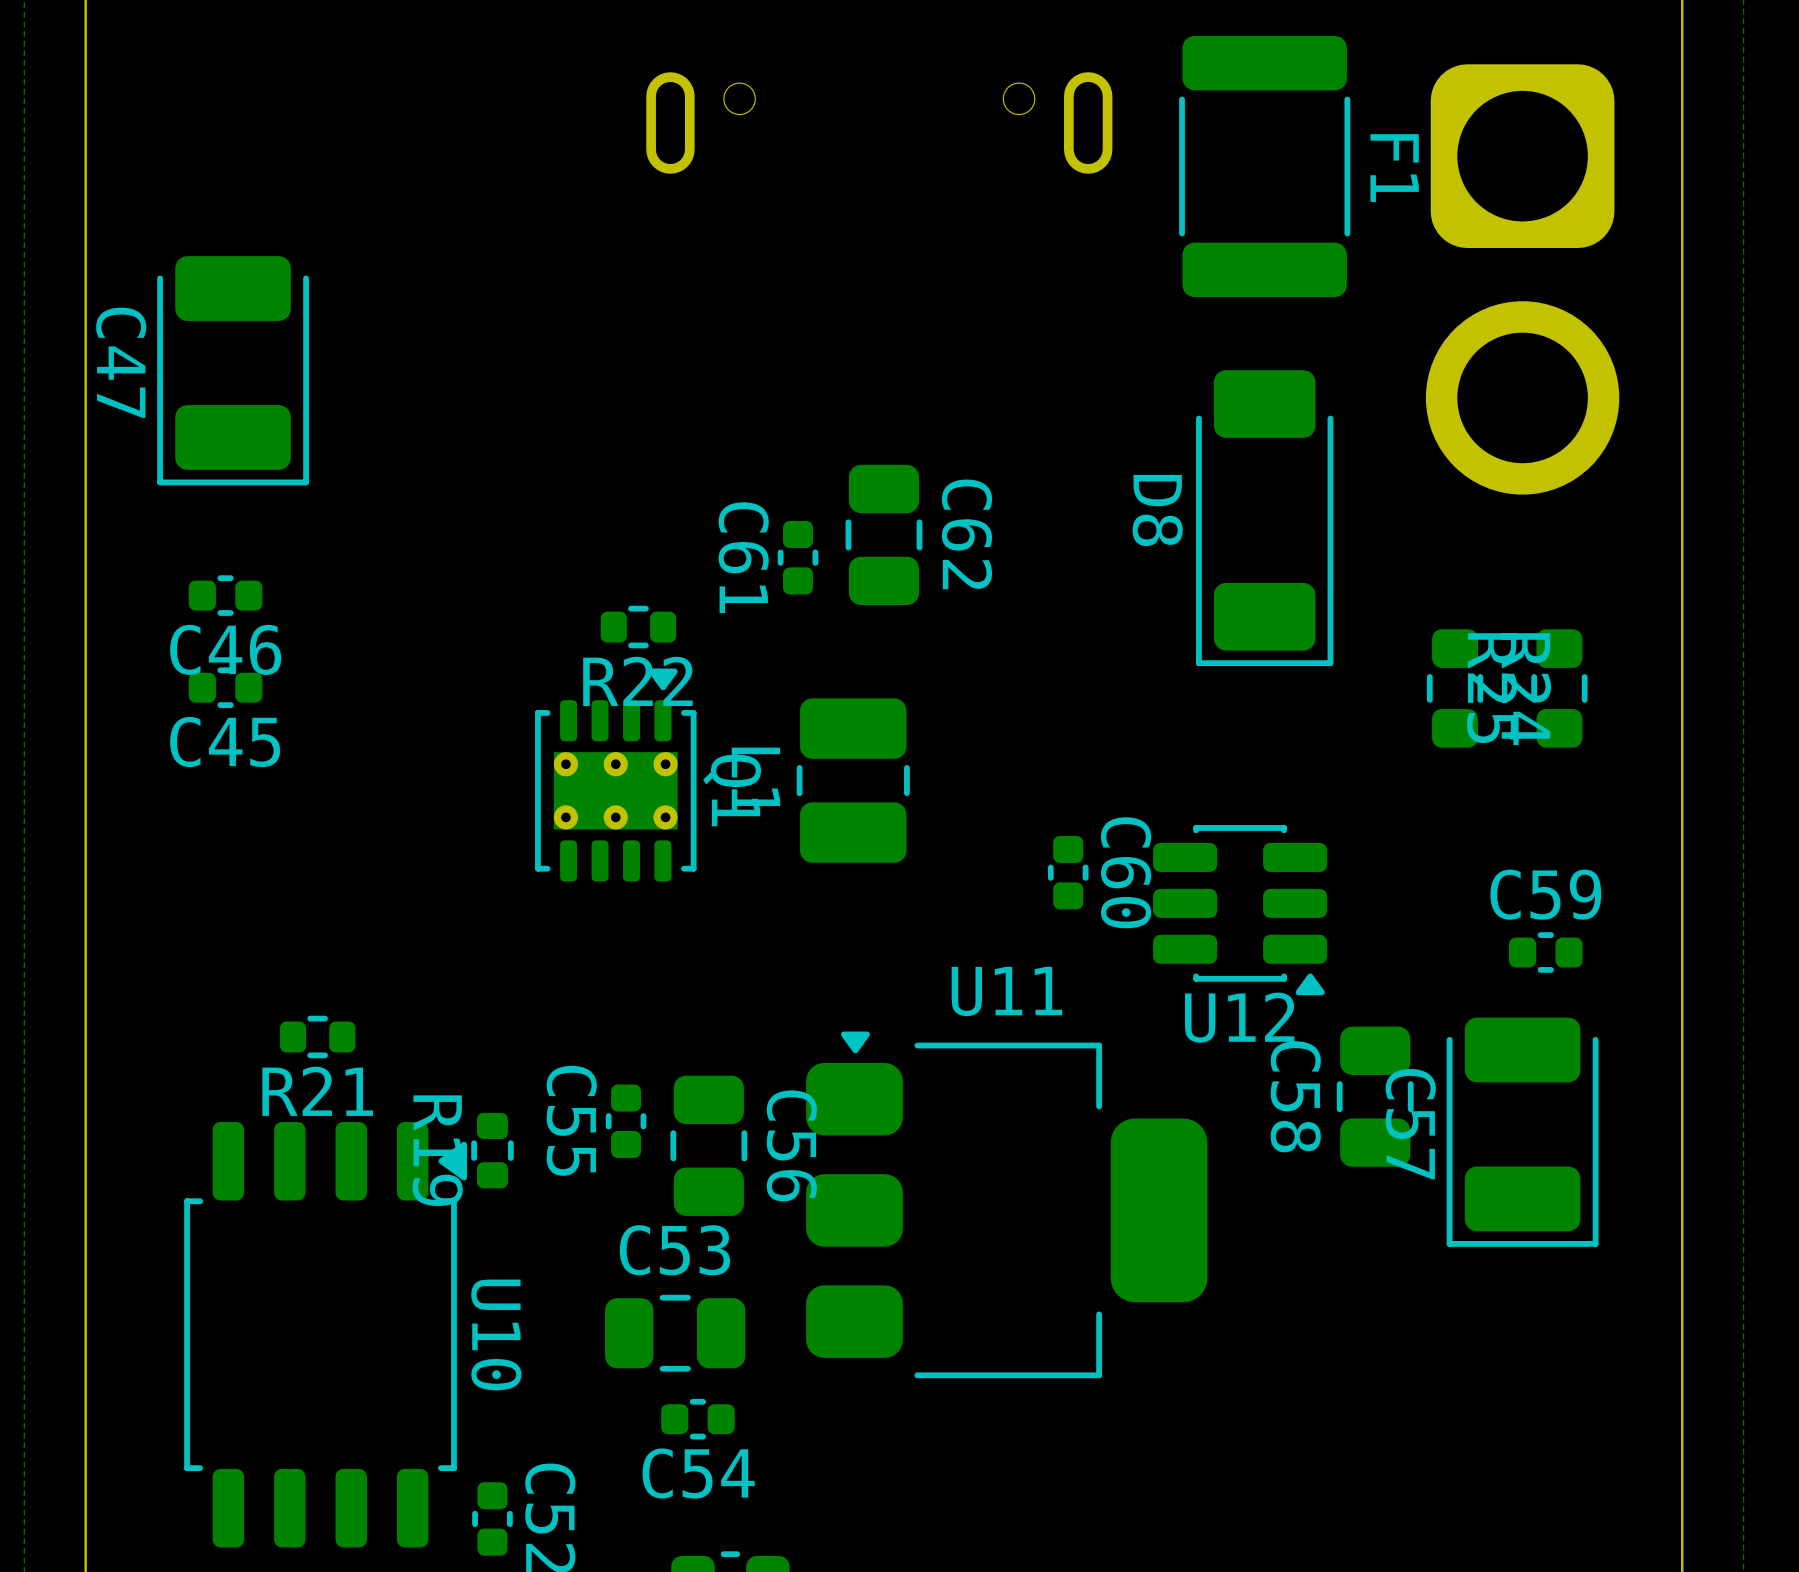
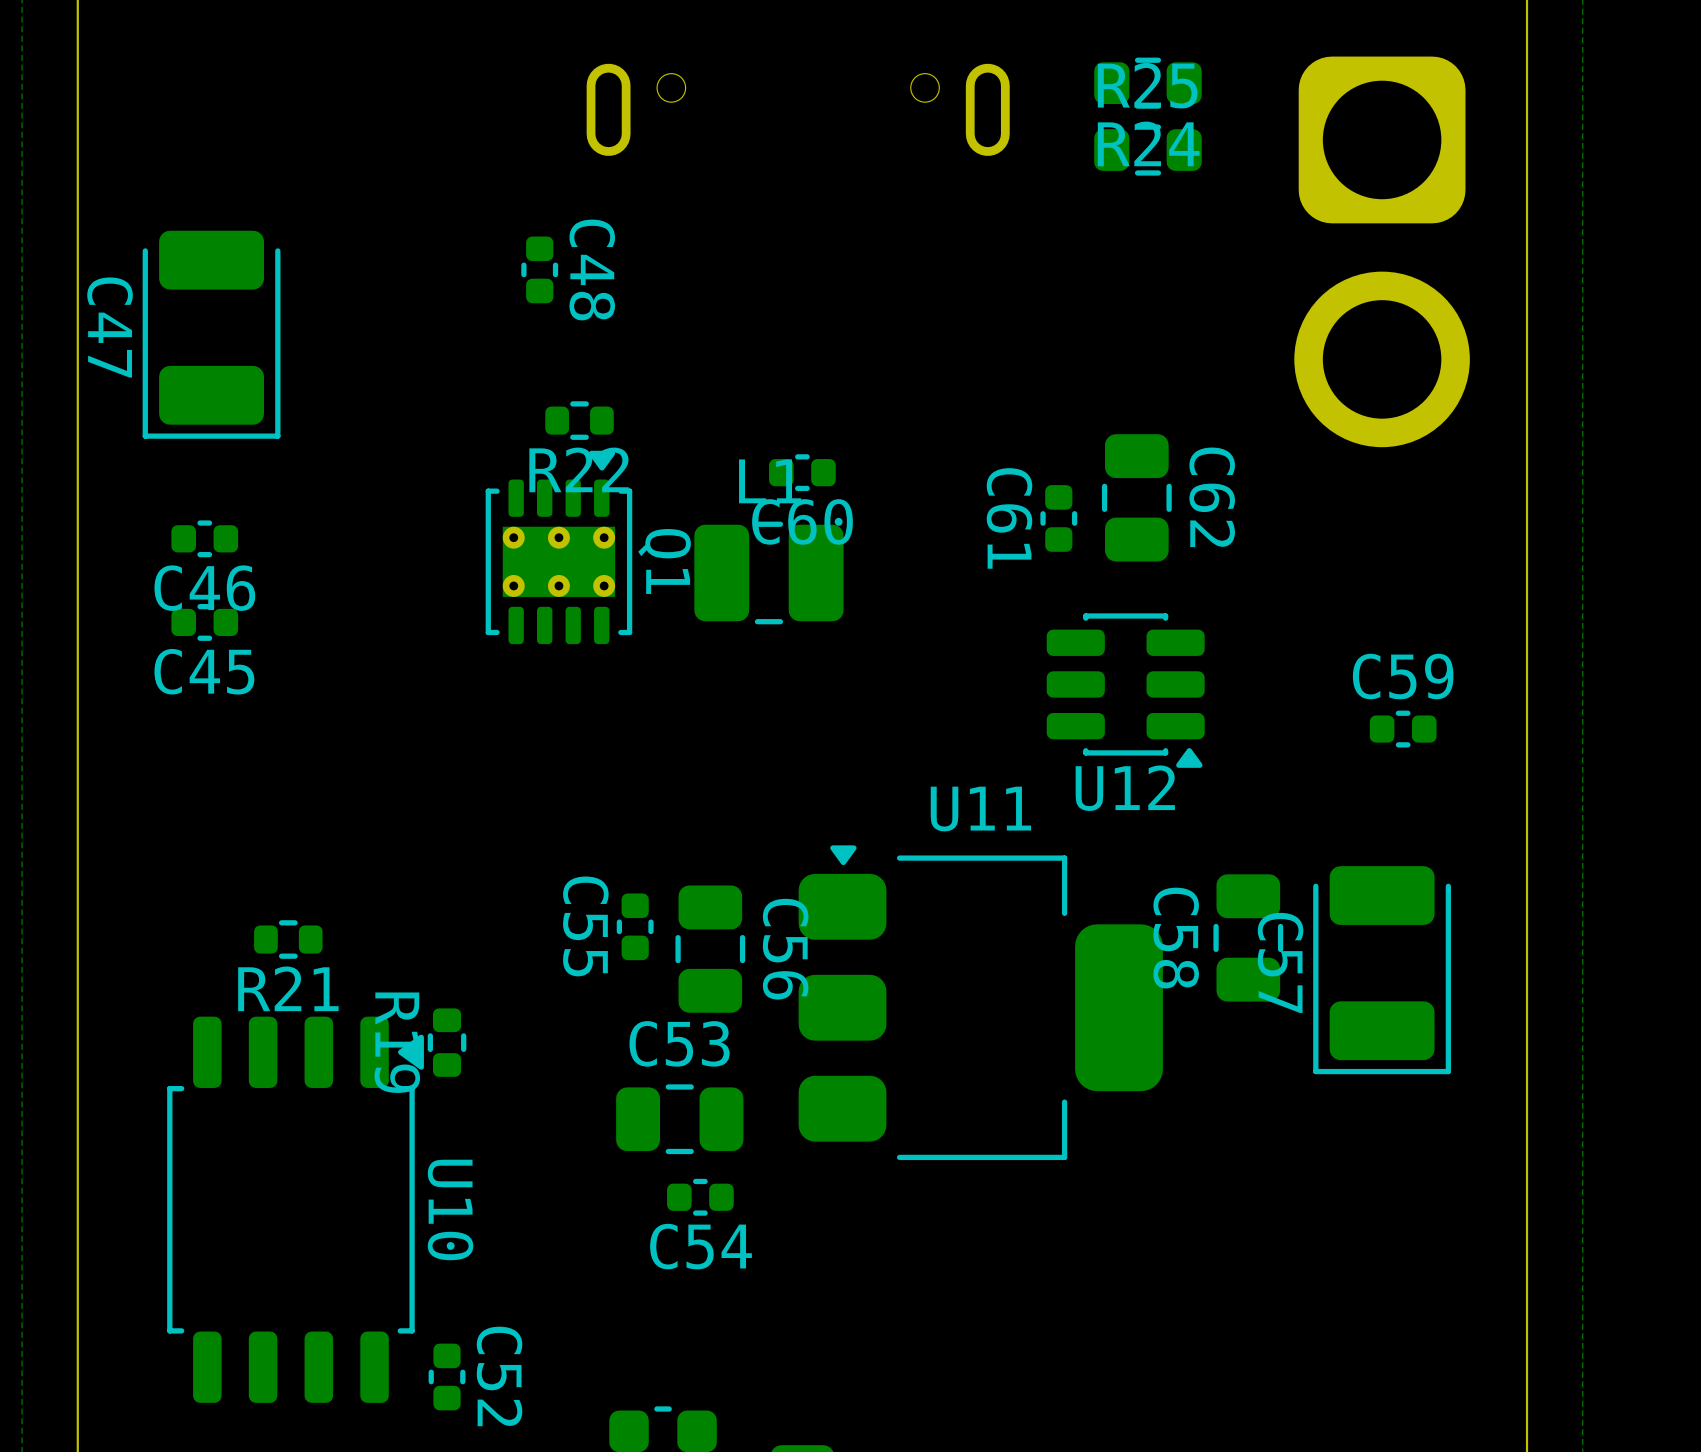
F1: (1264, 166) -> none
C48: none -> (539, 269)
D8: (1264, 518) -> none
C62 position: (883, 534) -> (1136, 497)
C61 position: (798, 557) -> (1058, 518)
R22 position: (638, 627) -> (579, 420)
R24 rotation: 0° (1455, 688) -> 90° clockwise (1147, 83)
R24 position: (1455, 688) -> (1147, 83)
R25 rotation: 0° (1559, 688) -> 90° clockwise (1147, 150)
R25 position: (1559, 688) -> (1147, 150)
Q1 position: (615, 774) -> (558, 547)
L1 rotation: 0° (853, 780) -> 90° clockwise (768, 572)
L1 position: (853, 780) -> (768, 572)
C60 rotation: 0° (1068, 872) -> 90° clockwise (802, 472)
C60 position: (1068, 872) -> (802, 472)
U12 position: (1240, 910) -> (1125, 690)
C59 position: (1545, 952) -> (1403, 729)
C58 position: (1375, 1096) -> (1248, 937)
C55 position: (626, 1121) -> (635, 926)
C57 position: (1522, 1132) -> (1382, 970)
C56 position: (708, 1145) -> (710, 949)
U11 position: (1006, 1204) -> (980, 1002)
C53 position: (675, 1333) -> (679, 1119)
C54 position: (697, 1419) -> (700, 1197)

